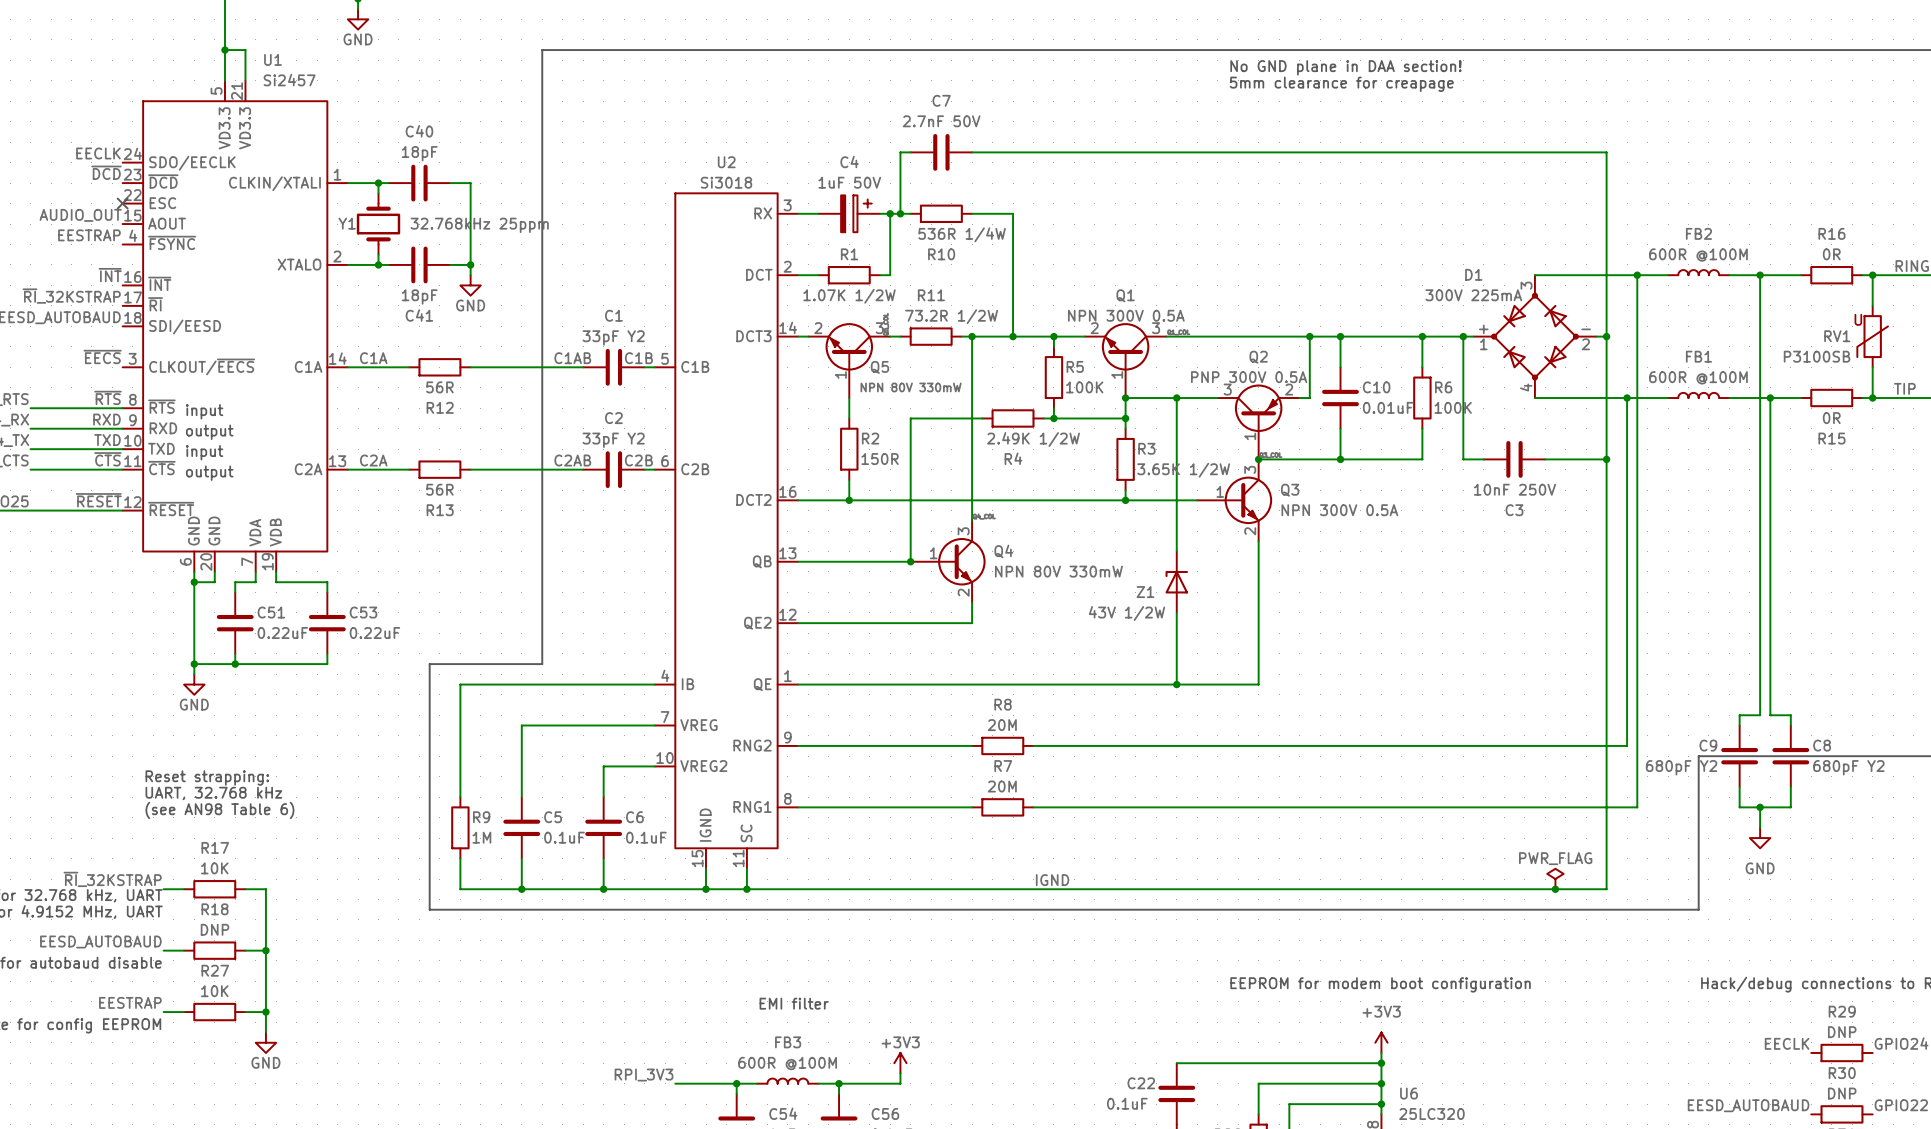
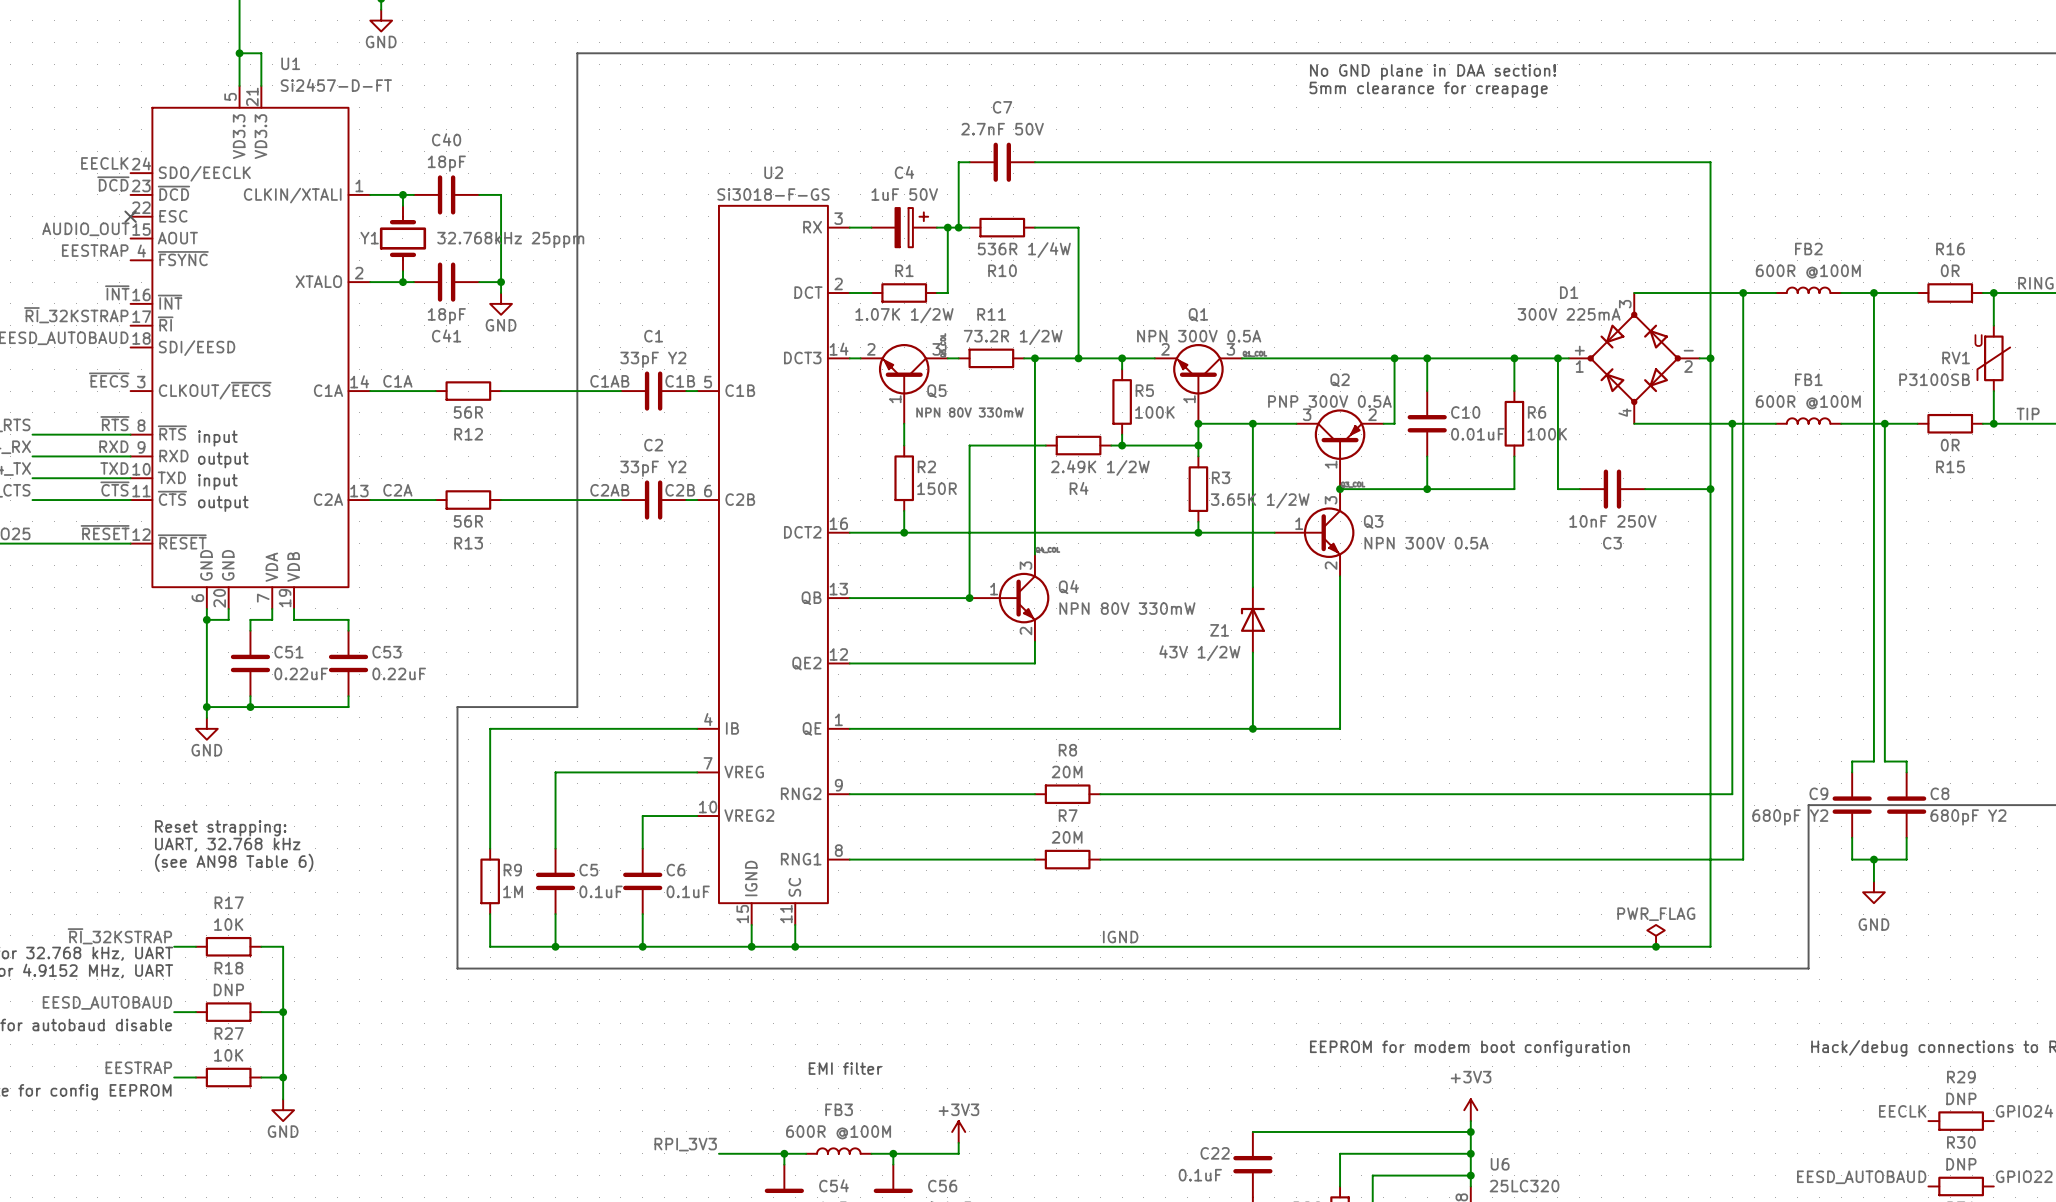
U1 value: Si2457 (289, 80) -> Si2457-D-FT (336, 85)
U2 value: Si3018 (726, 182) -> Si3018-F-GS (773, 194)

